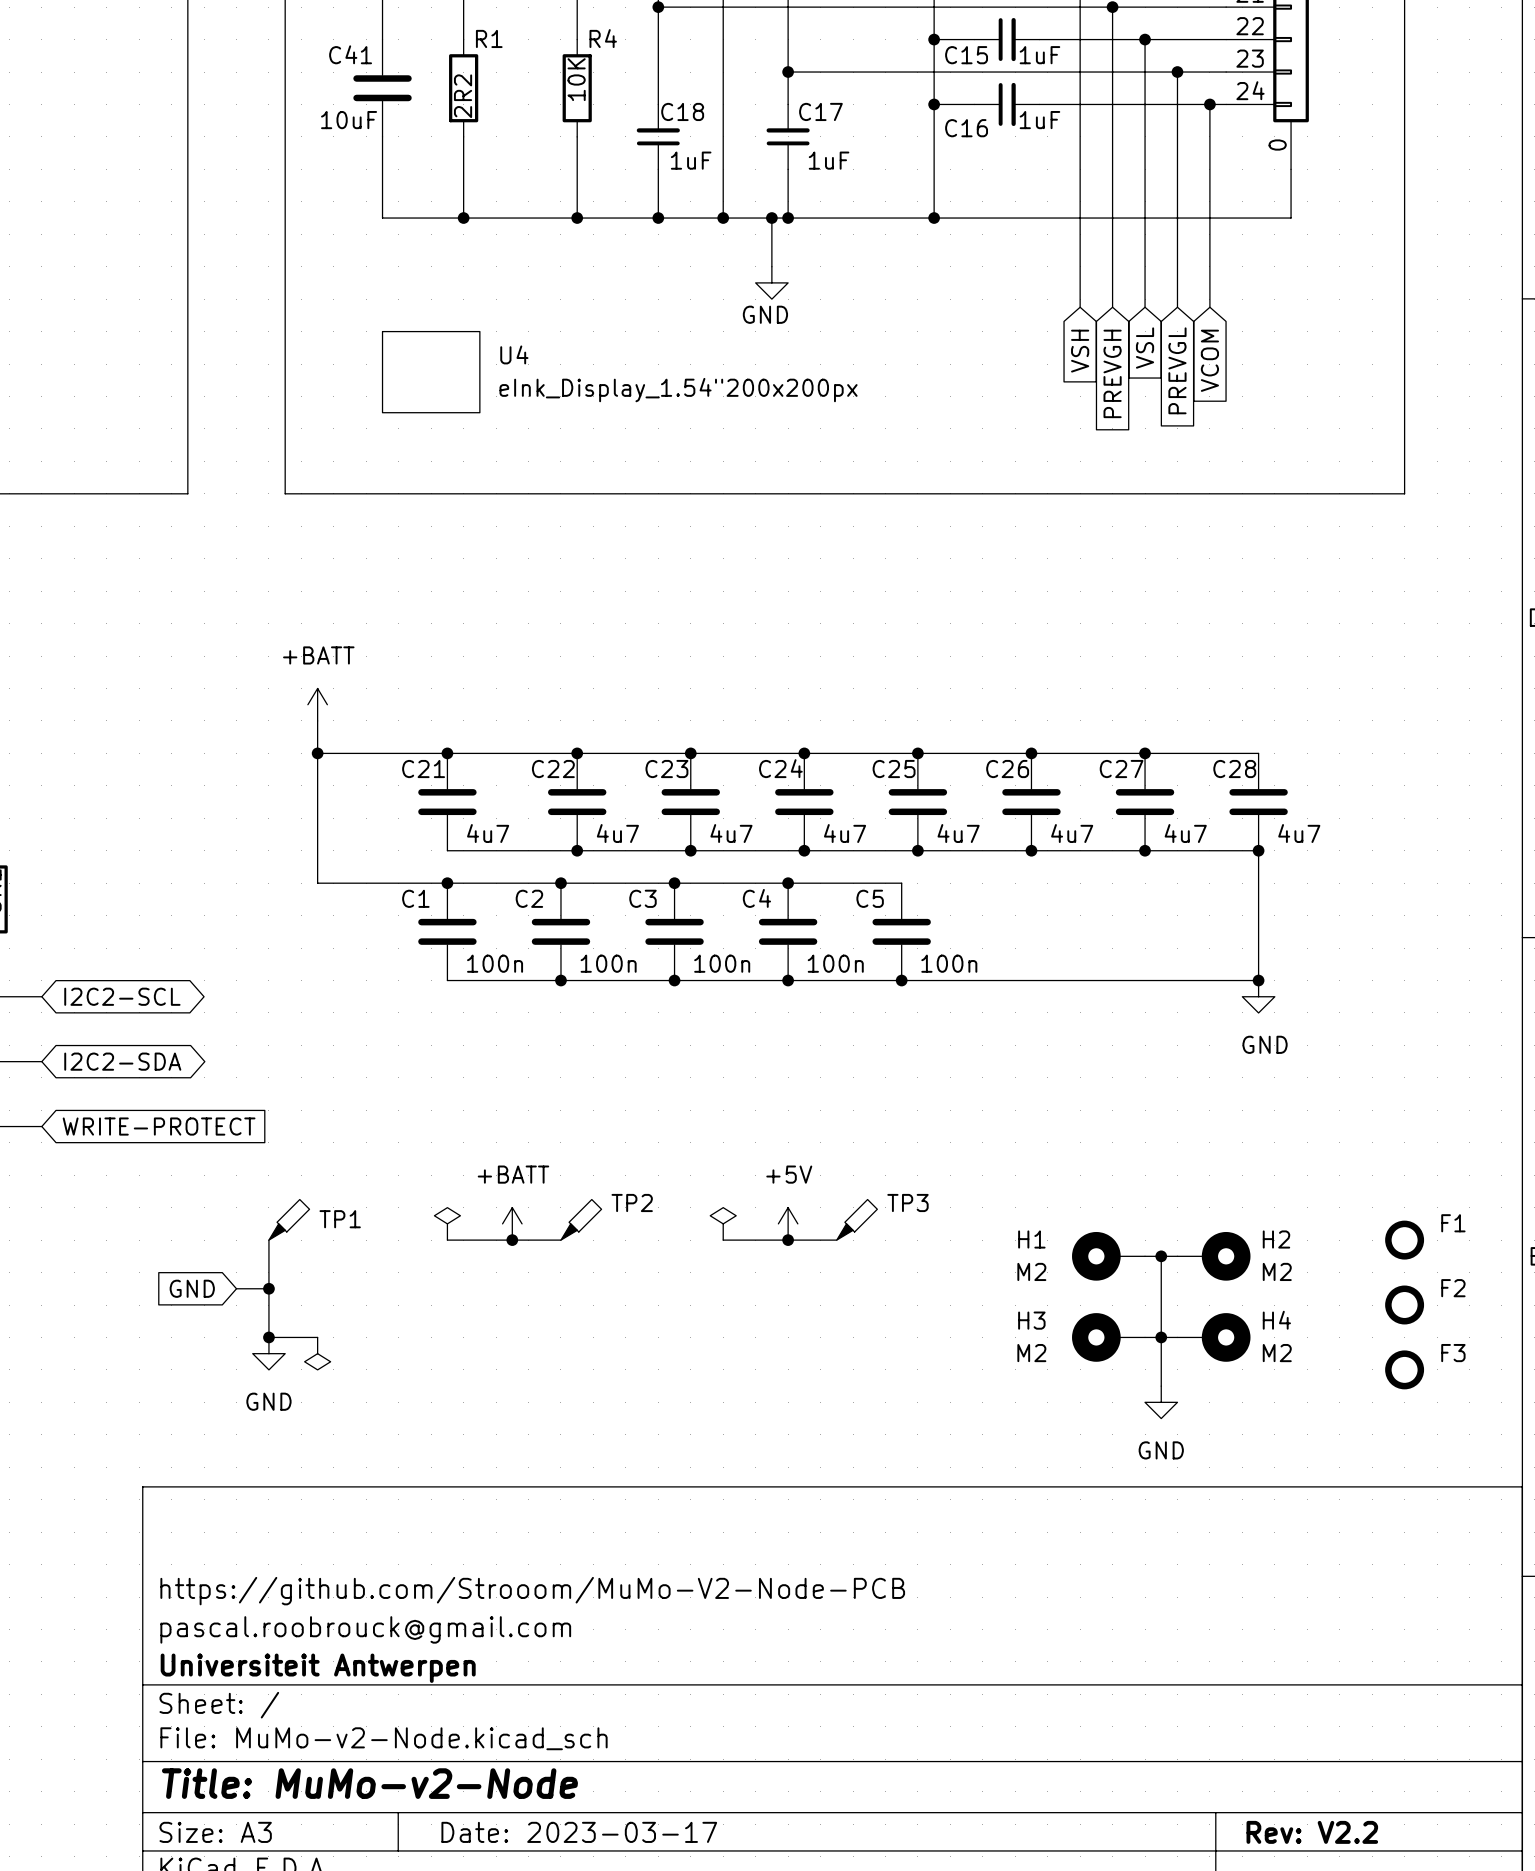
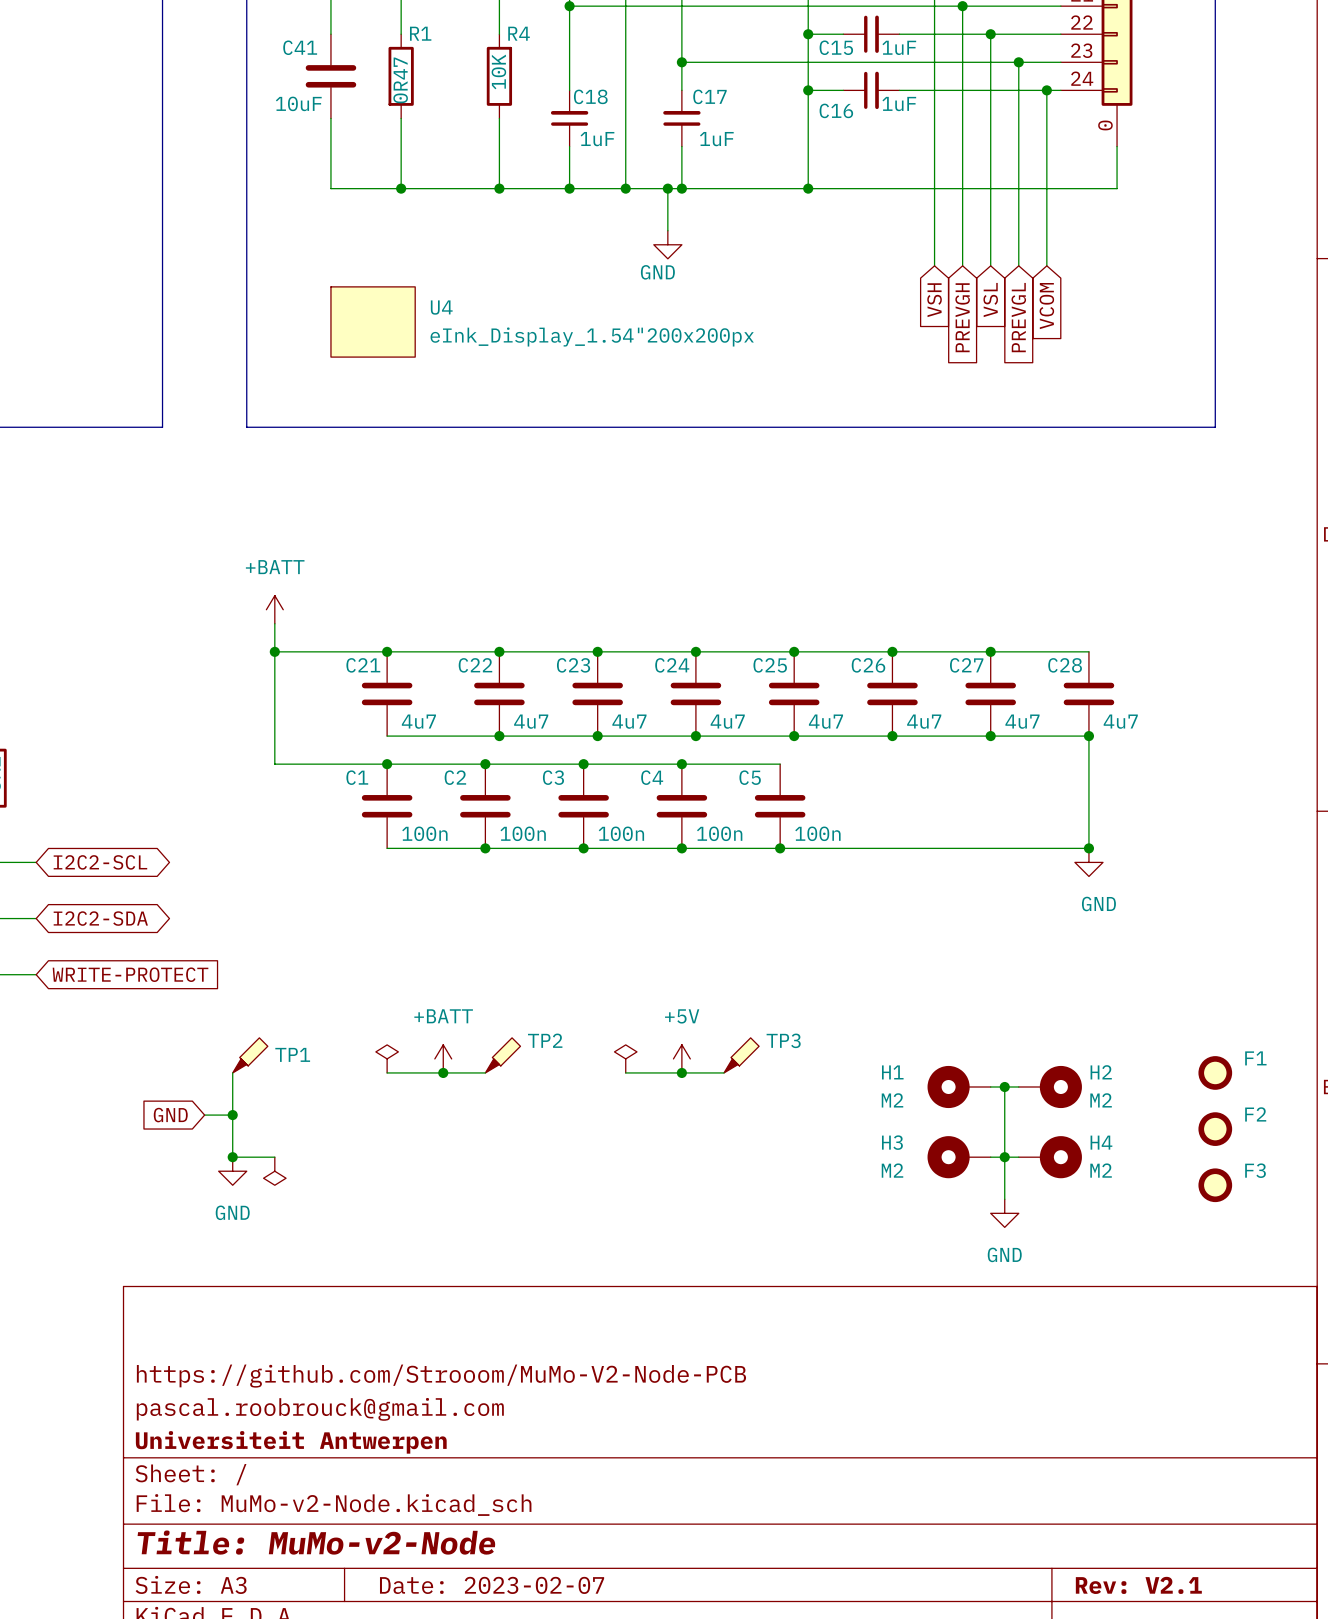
R1 value: 2R2 (463, 96) -> 0R47 (400, 80)
title block: Date: 2023-03-17 (579, 1832) -> Date: 2023-02-07 (492, 1585)
title block: Rev: V2.2 (1312, 1832) -> Rev: V2.1 (1138, 1585)

